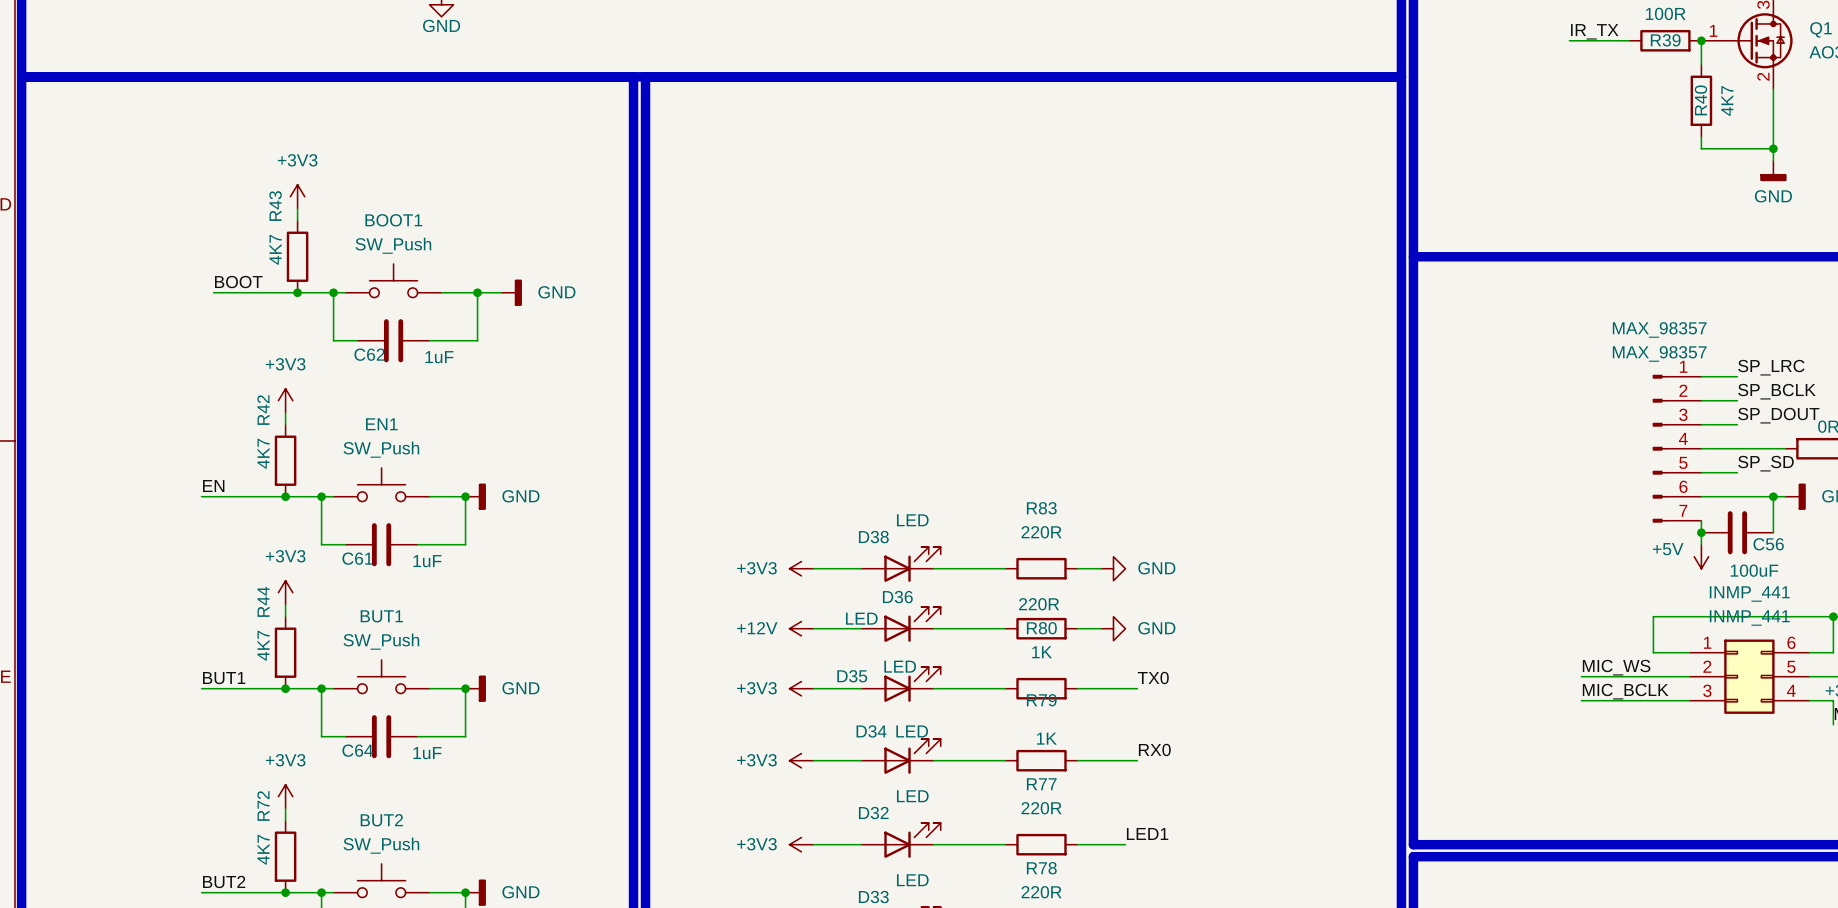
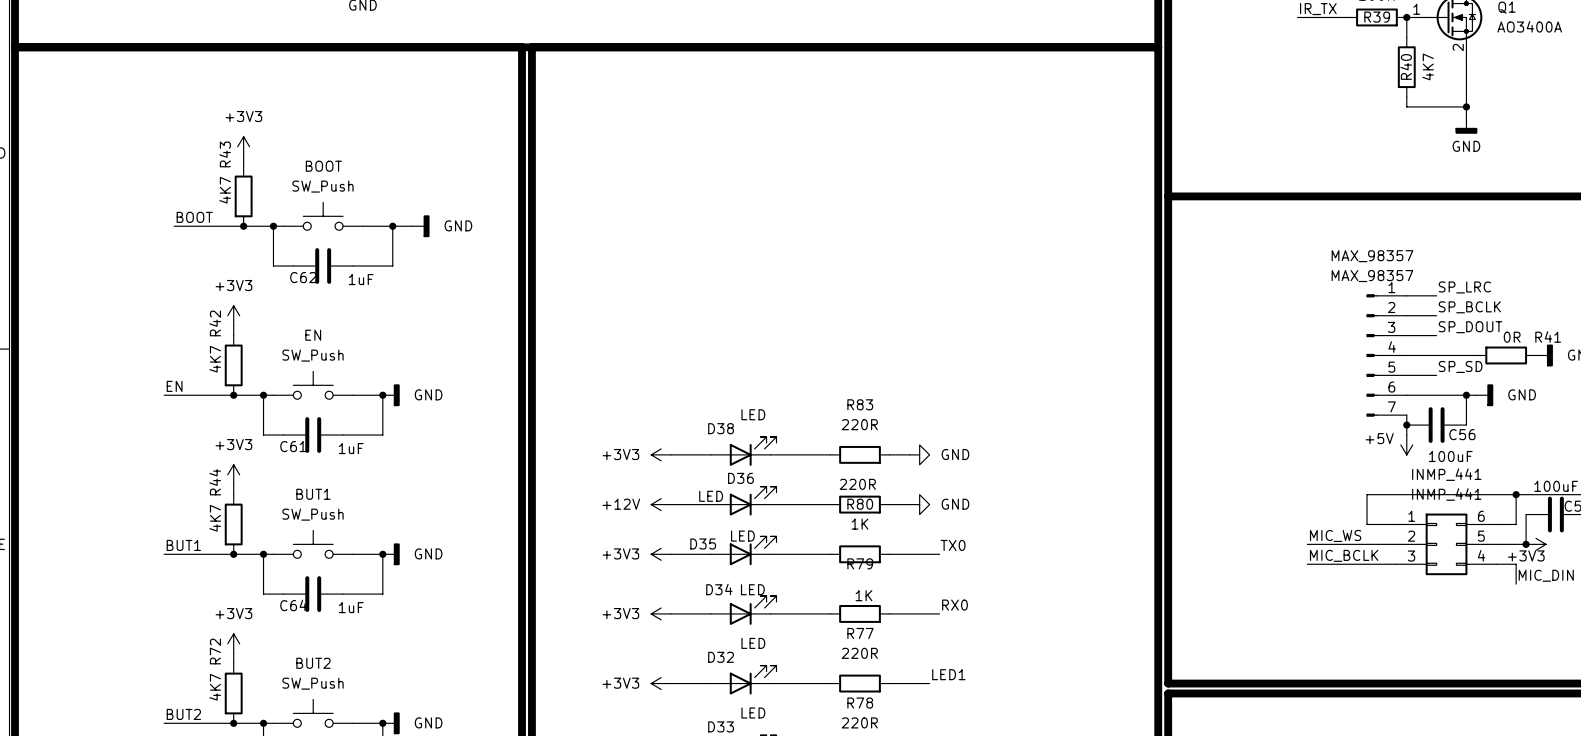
BOOT1 name: BOOT1 (393, 220) -> BOOT (323, 166)
EN1 name: EN1 (381, 424) -> EN (313, 335)

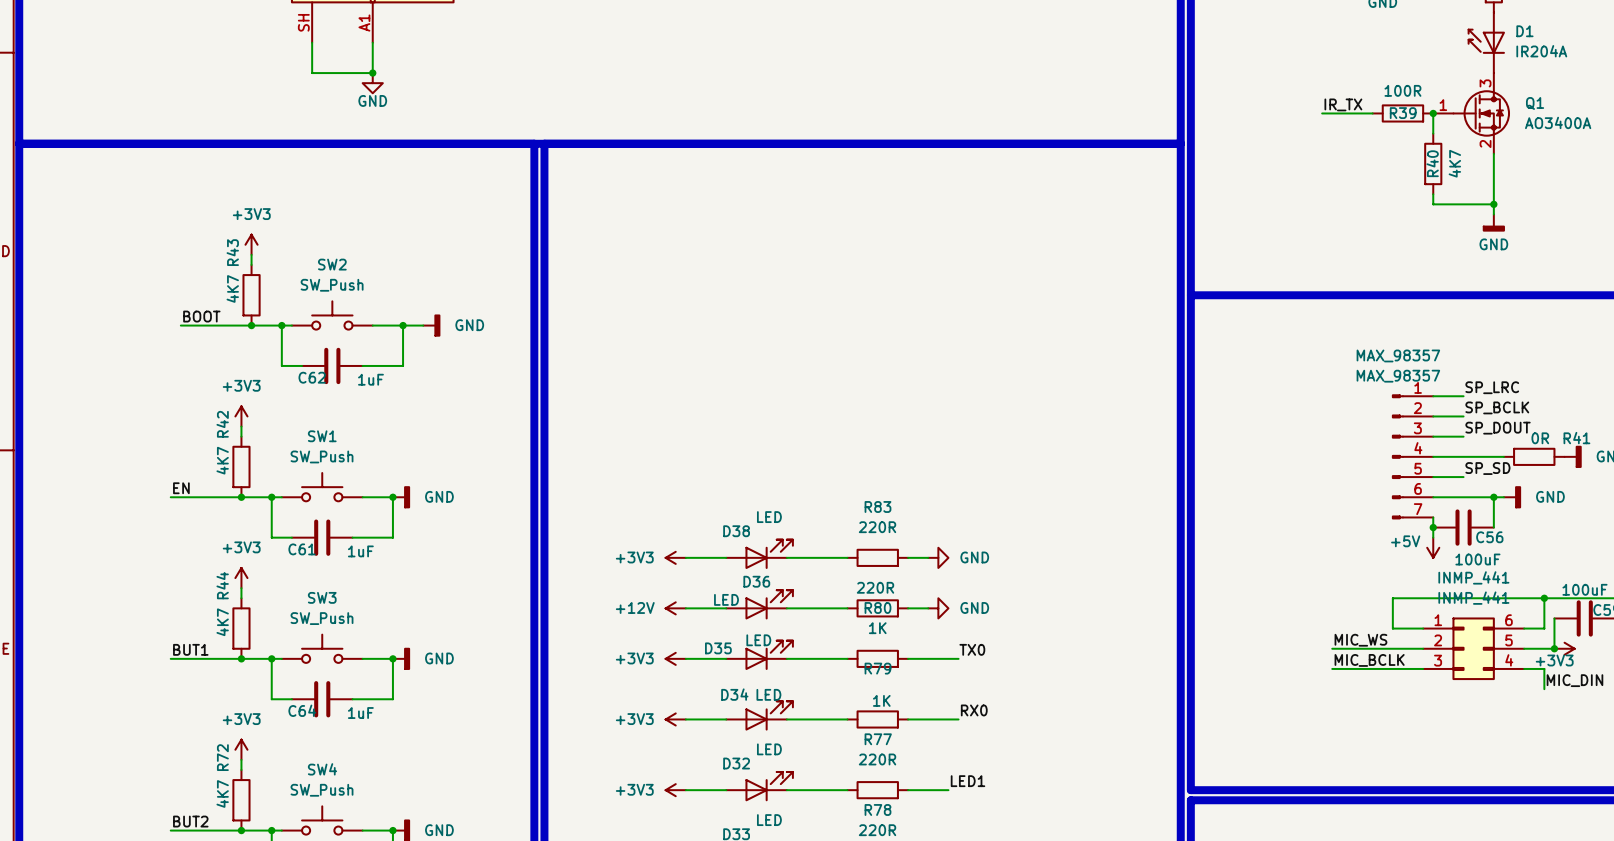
BOOT name: BOOT (323, 166) -> SW2 (332, 264)
EN name: EN (313, 335) -> SW1 (322, 436)
BUT1 name: BUT1 (313, 494) -> SW3 (322, 597)
BUT2 name: BUT2 (313, 663) -> SW4 (322, 769)

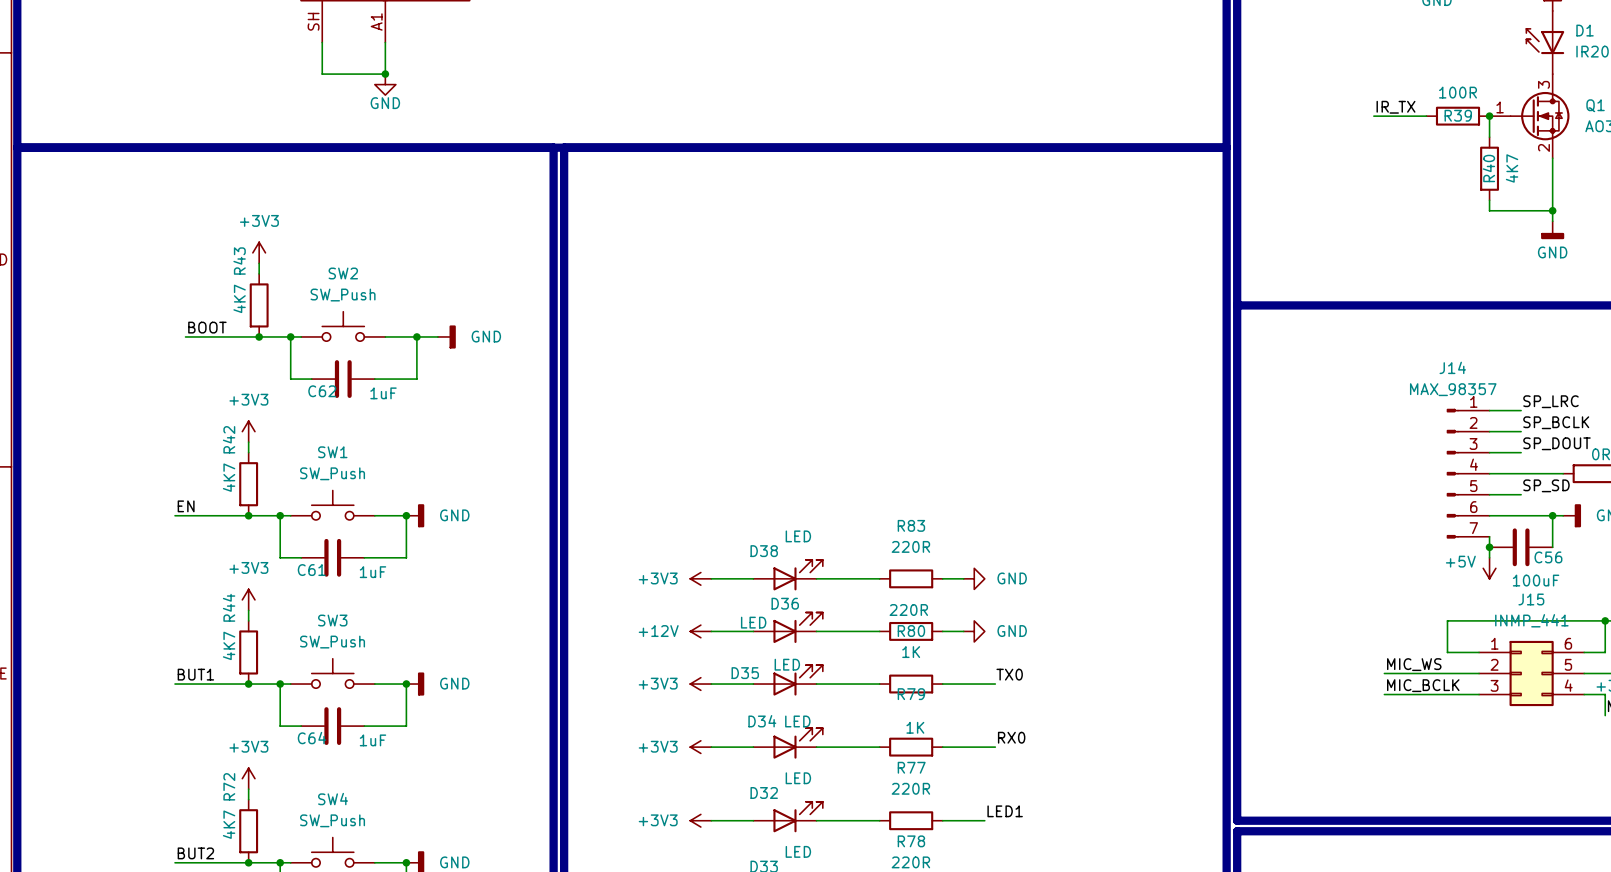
MAX_98357 name: MAX_98357 (1398, 355) -> J14 (1452, 367)
INMP_441 name: INMP_441 (1473, 577) -> J15 (1531, 599)

